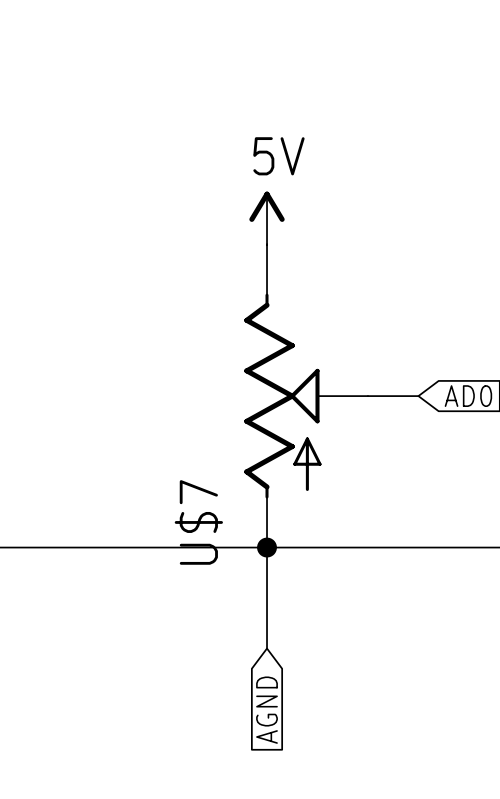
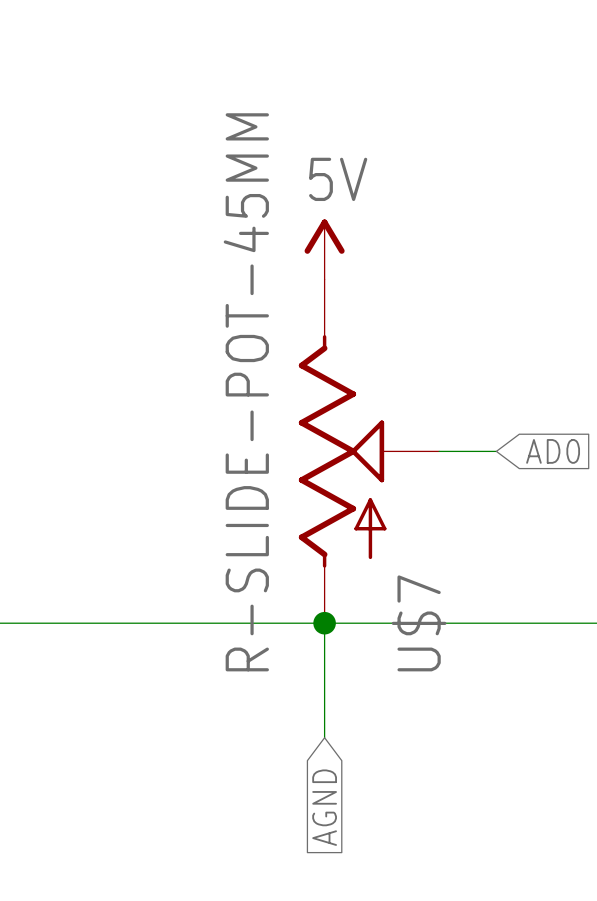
U$7 value: none -> R-SLIDE-POT-45MM (246, 392)
U$7 name position: U$7 (198, 522) -> U$7 (419, 623)

